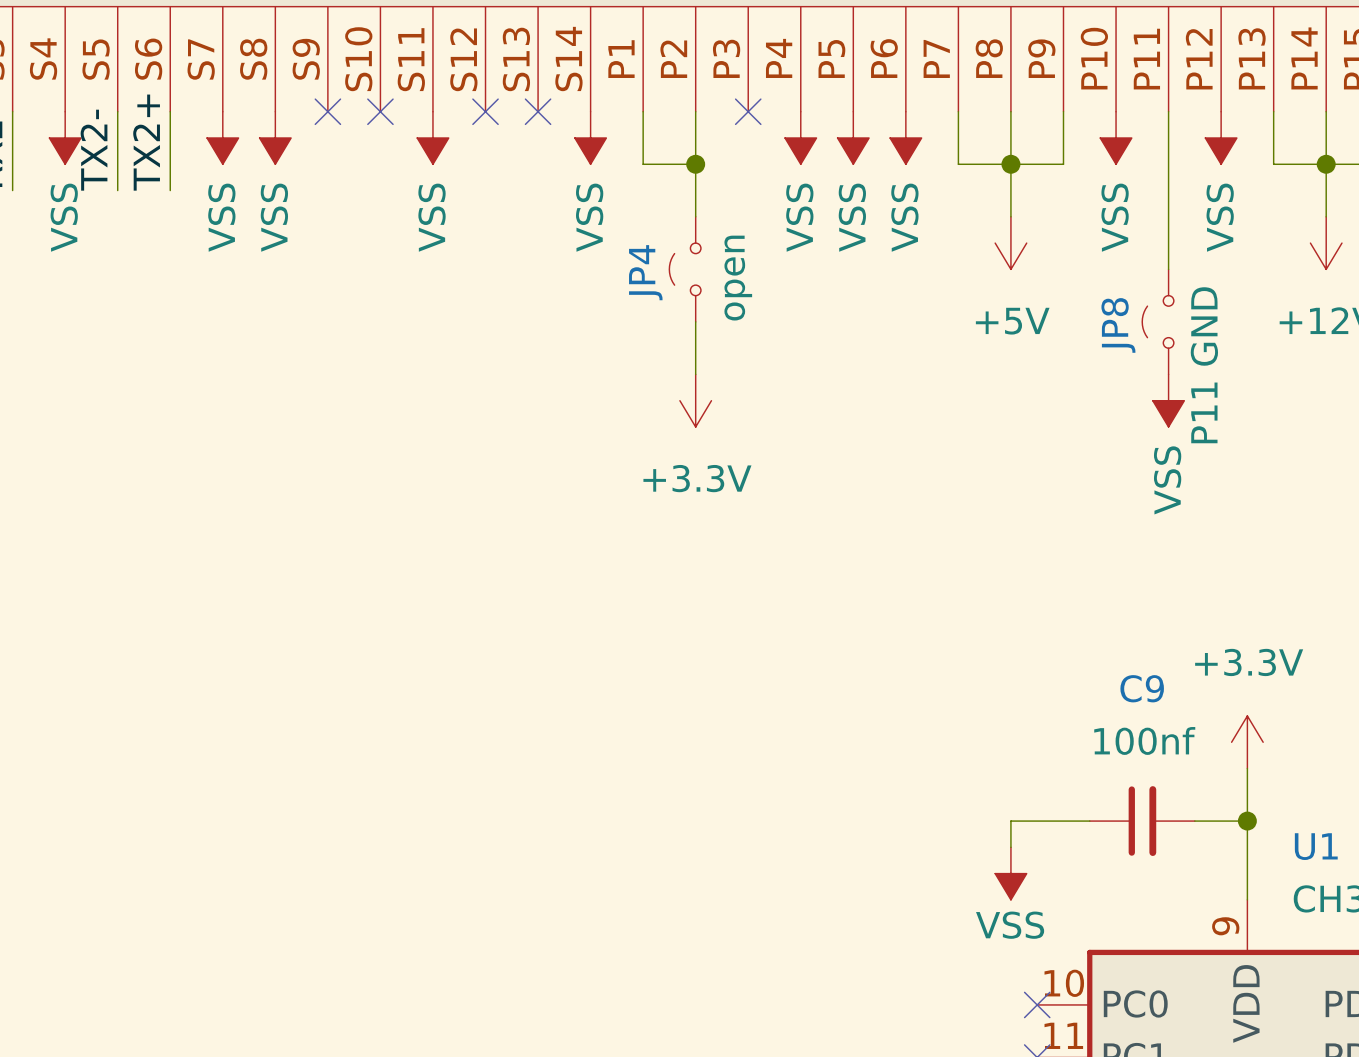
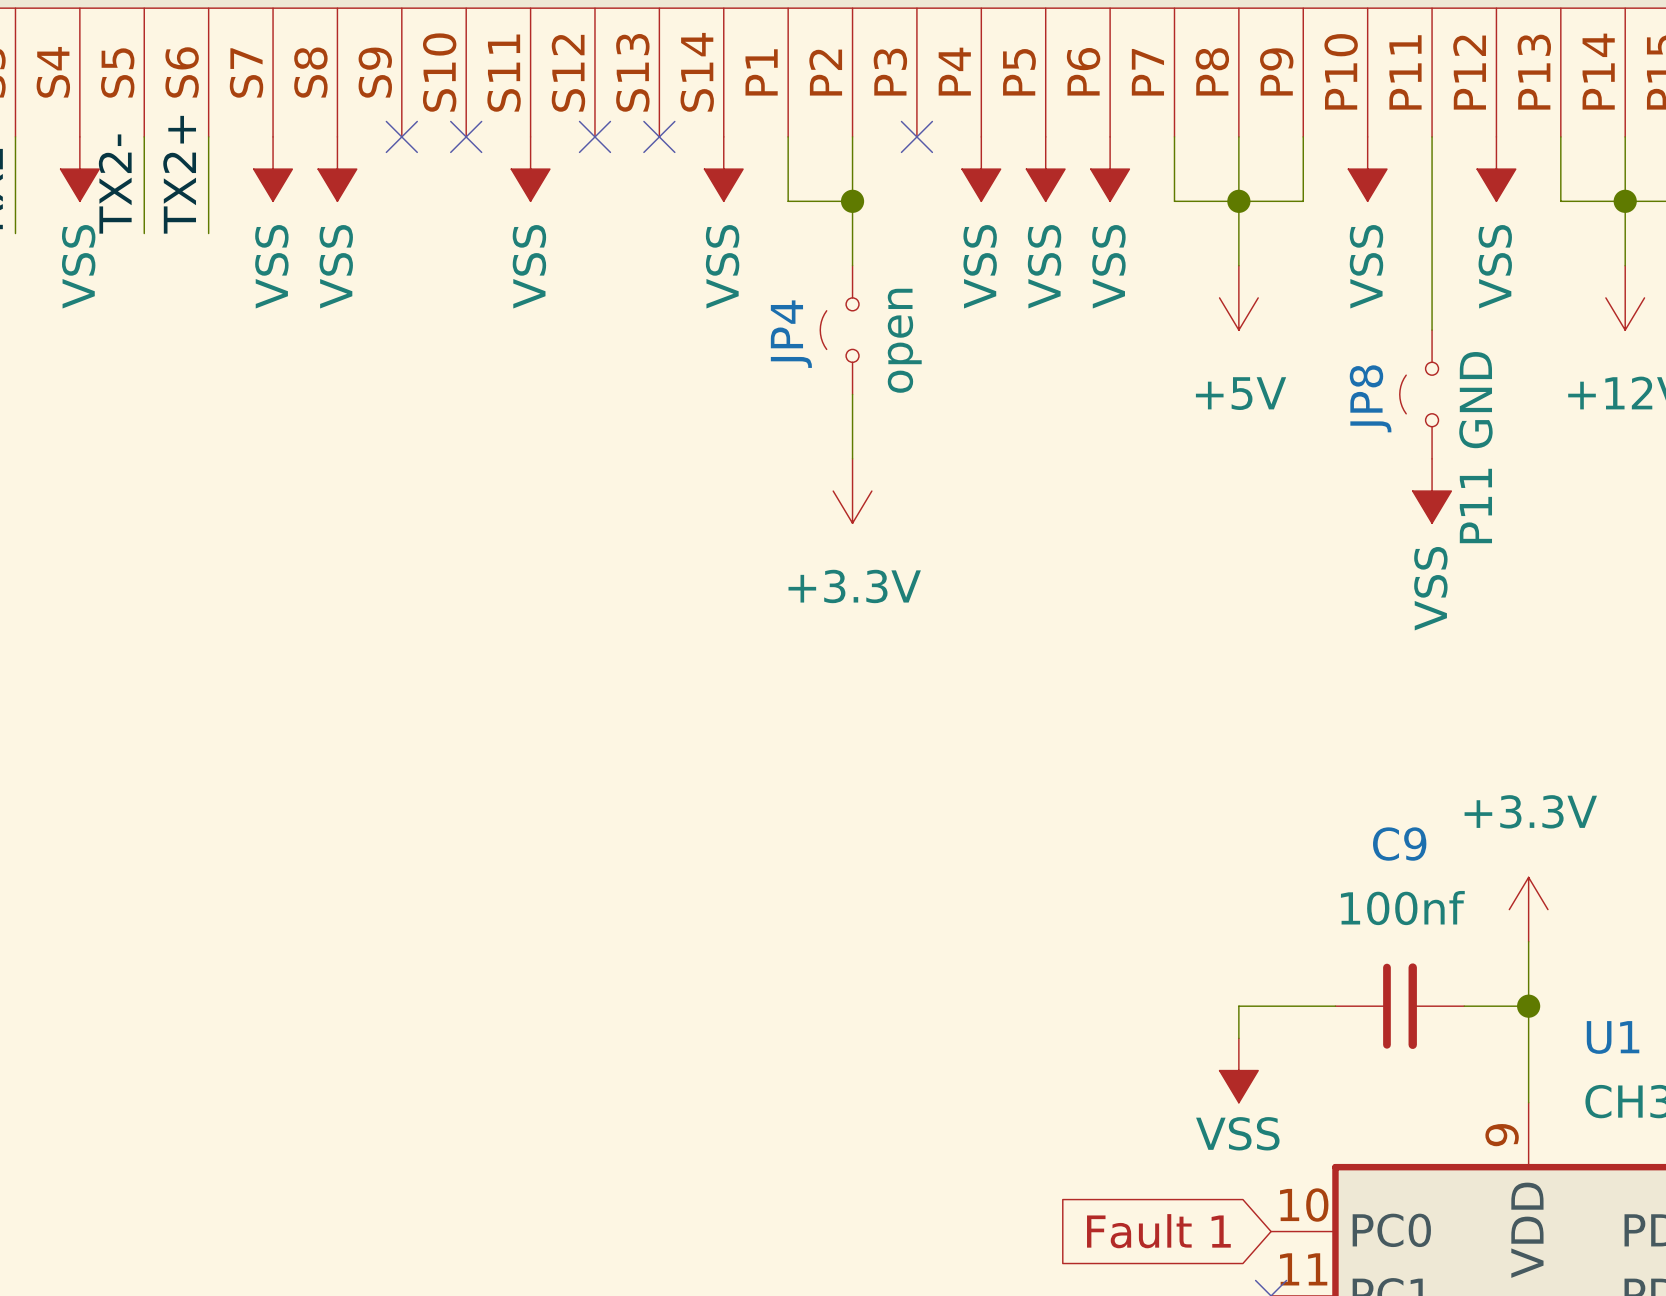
global label: none -> Fault 1 (1158, 1231)
no-connect mark: (1037, 1004) -> none

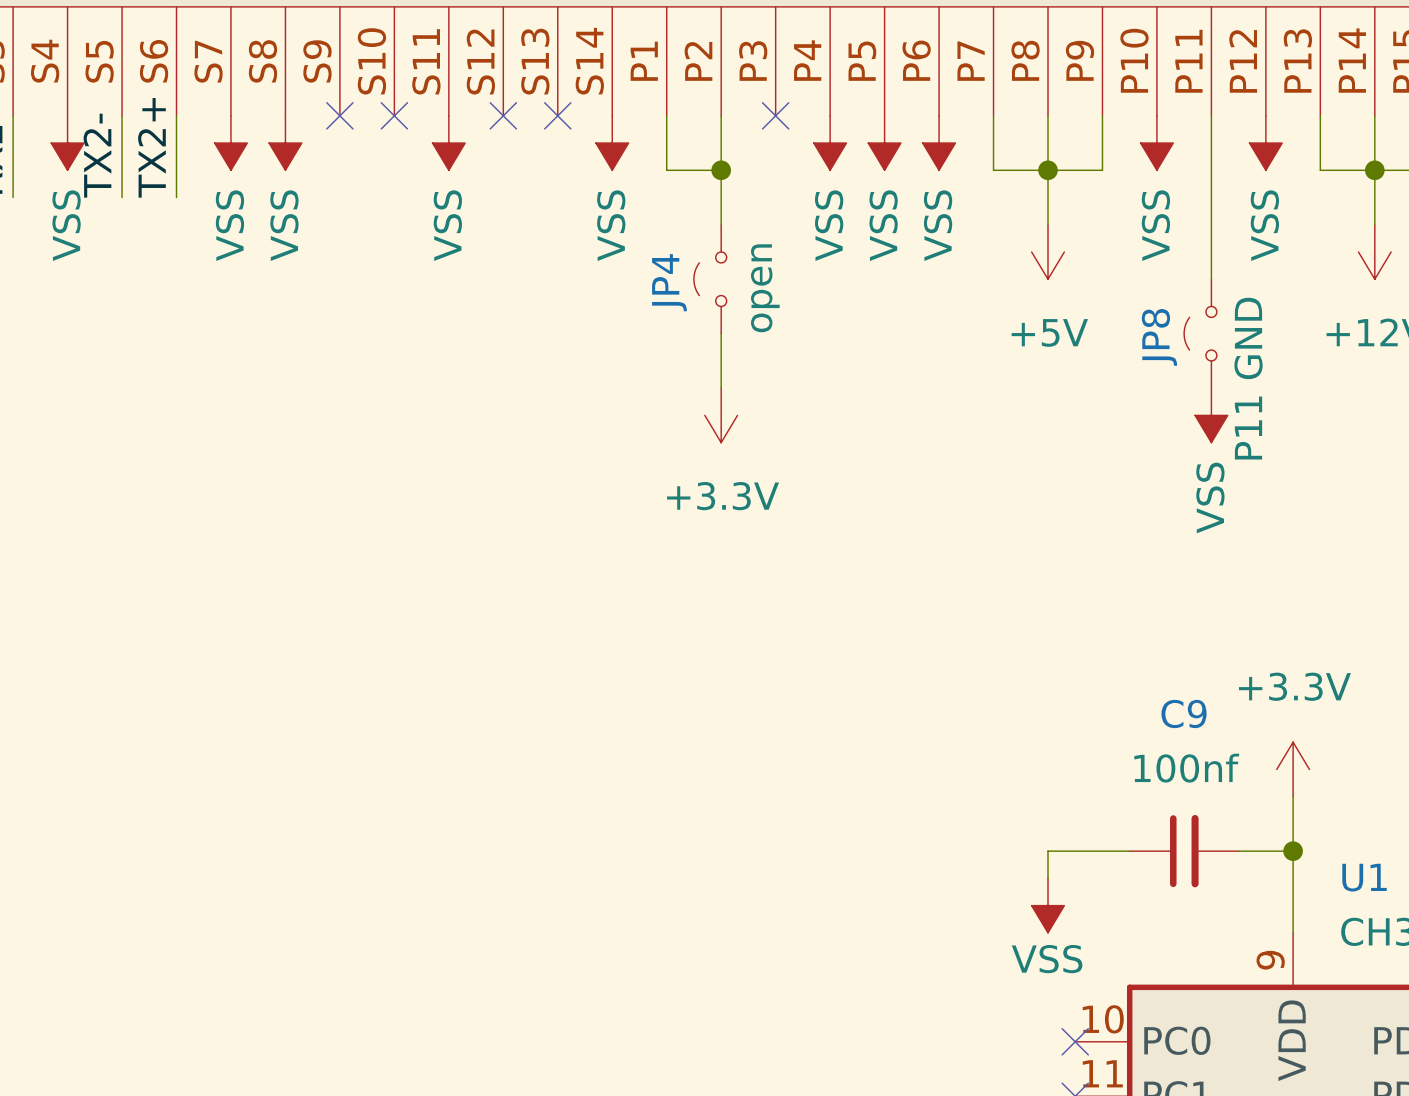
global label: Fault 1 (1158, 1231) -> none
no-connect mark: none -> (1075, 1041)

